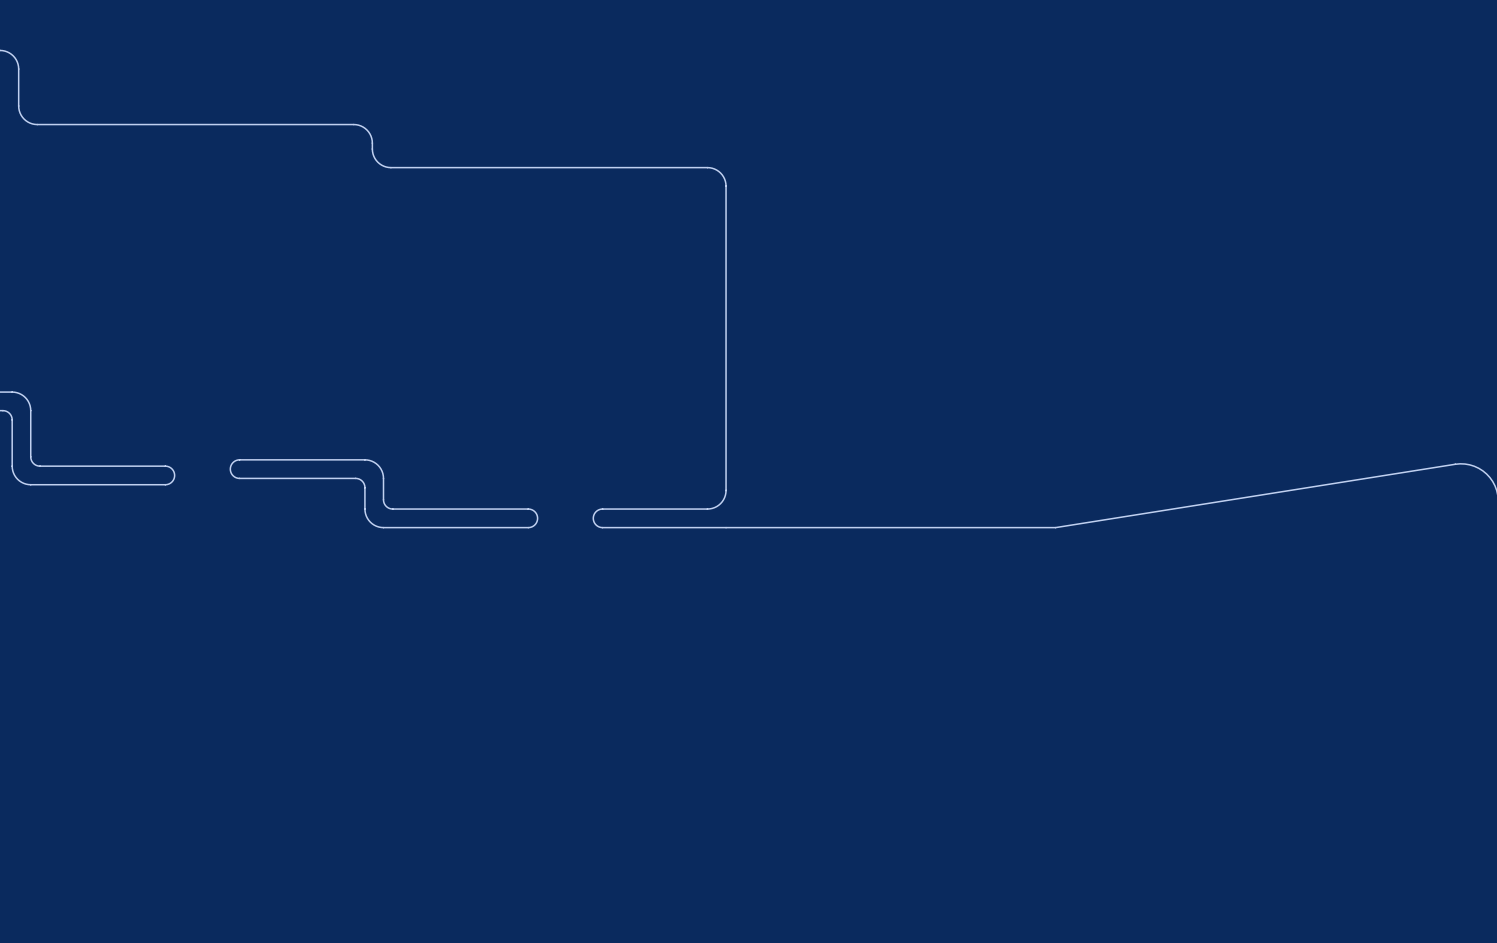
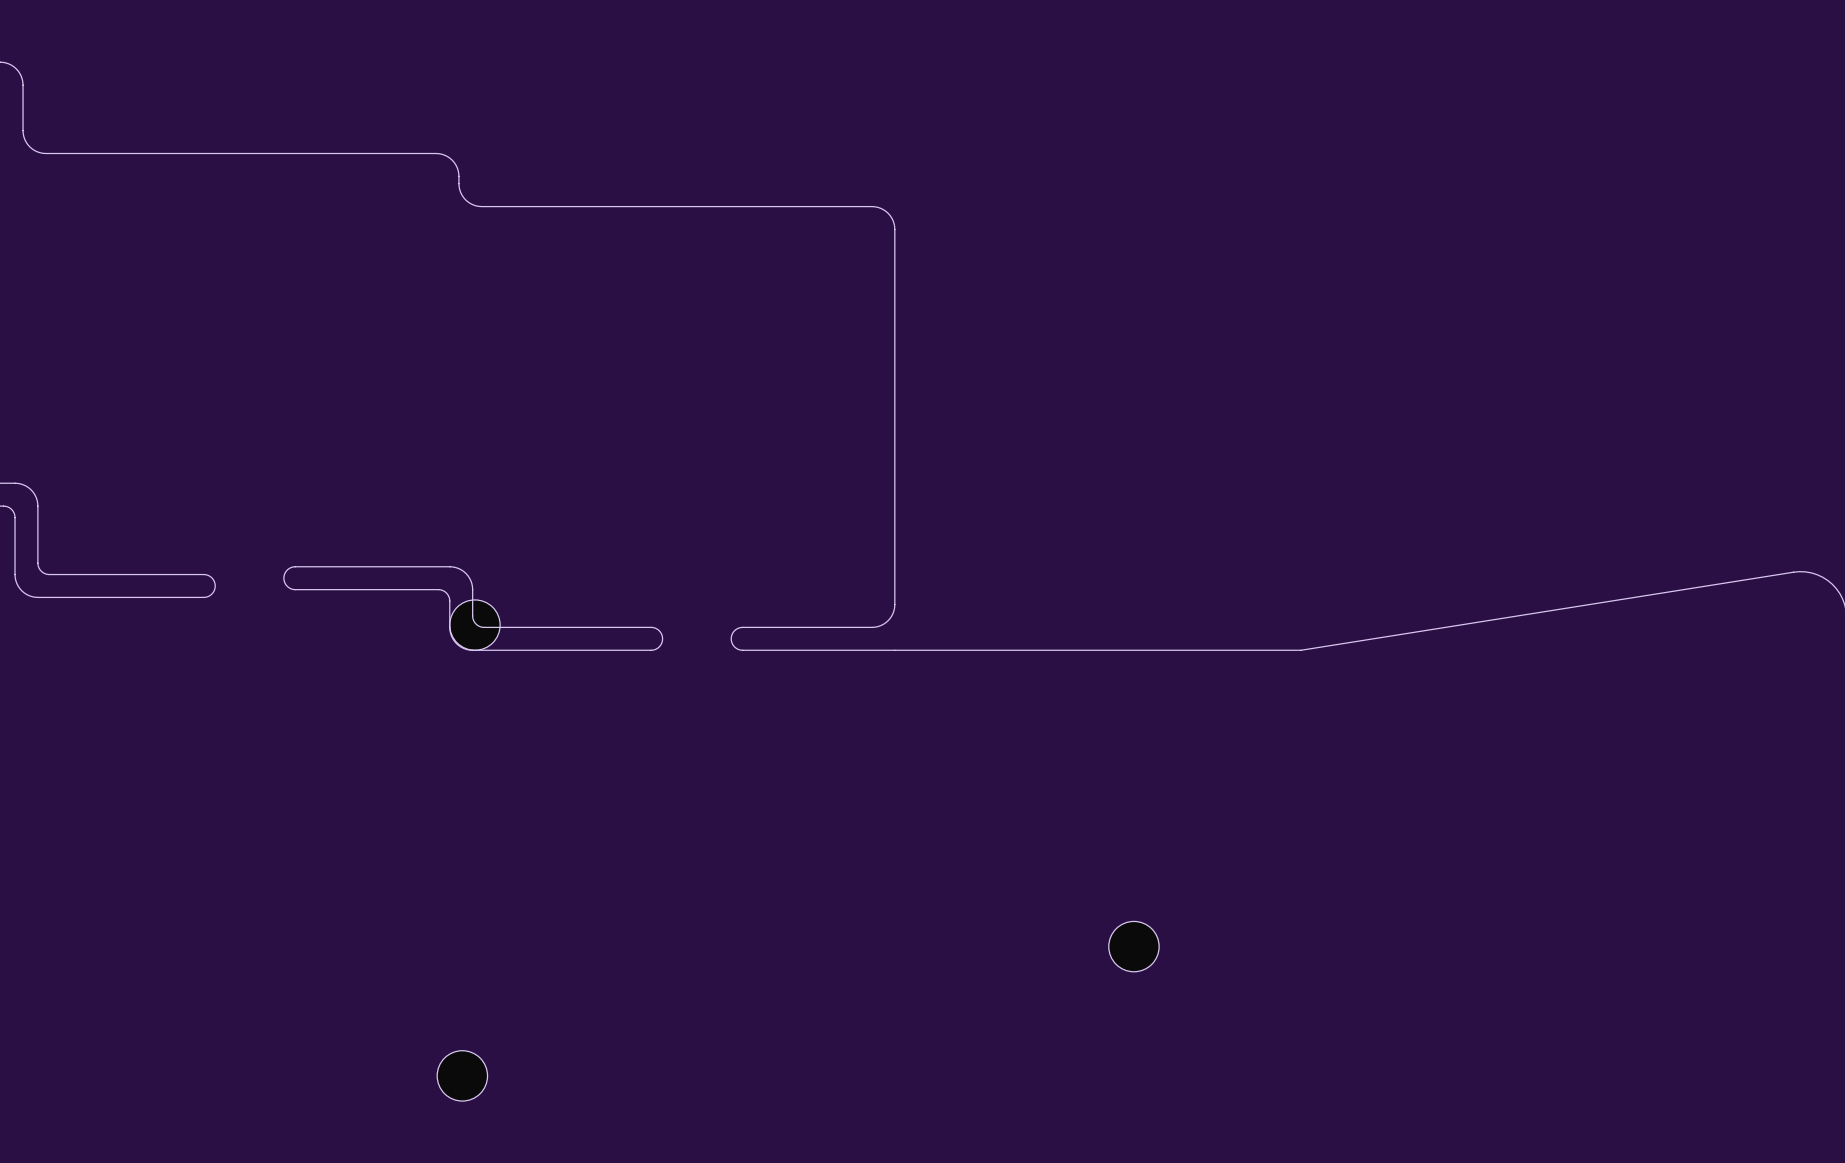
part: none -> (474, 625)
part: none -> (1133, 946)
part: none -> (462, 1075)

